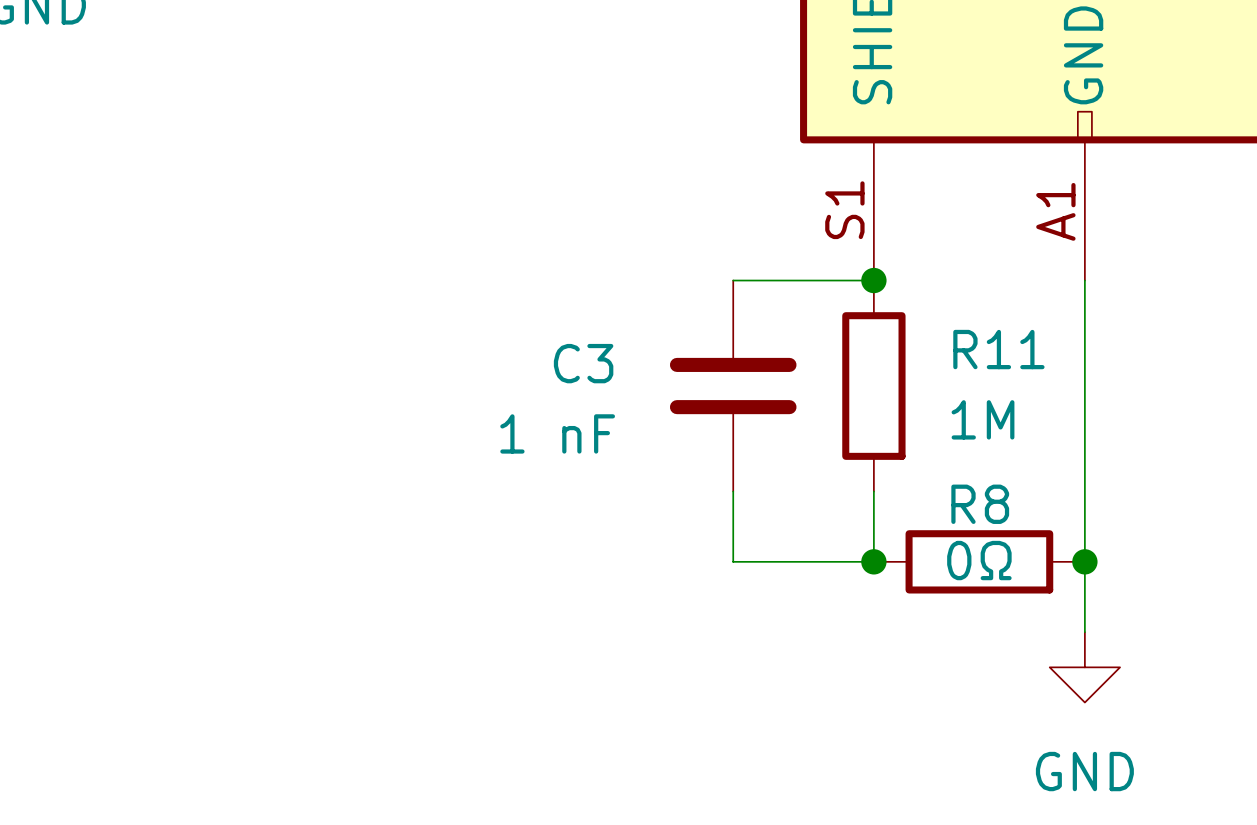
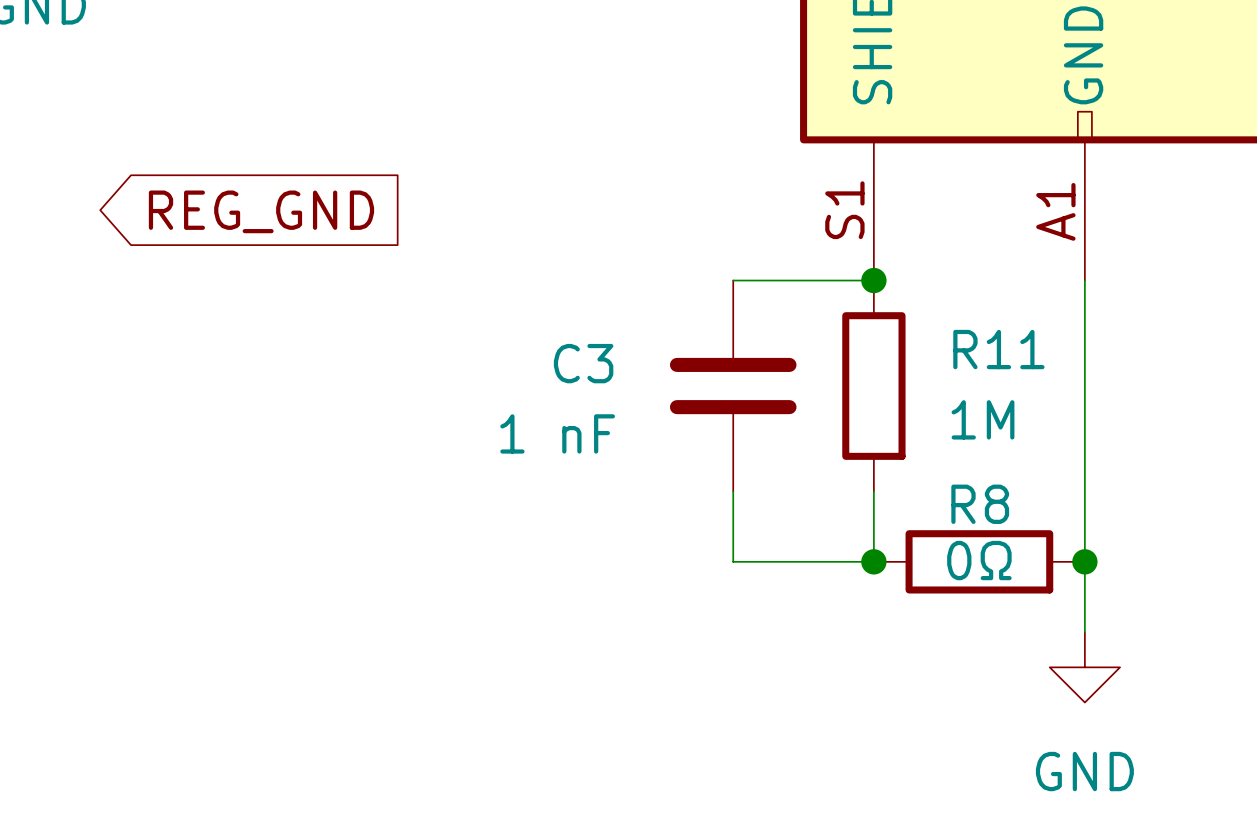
global label: none -> REG_GND (261, 211)

